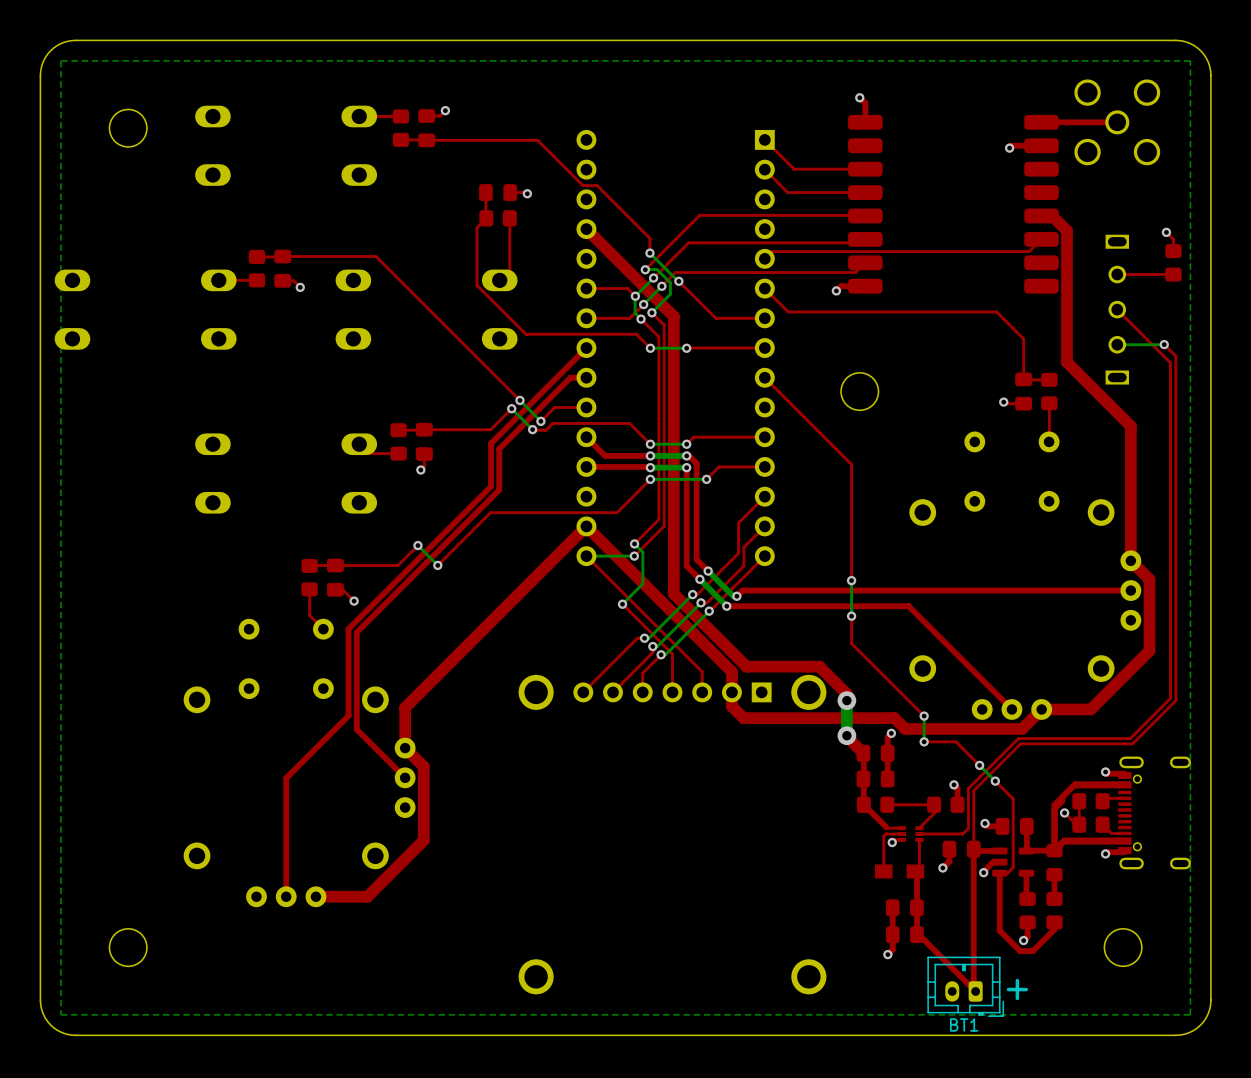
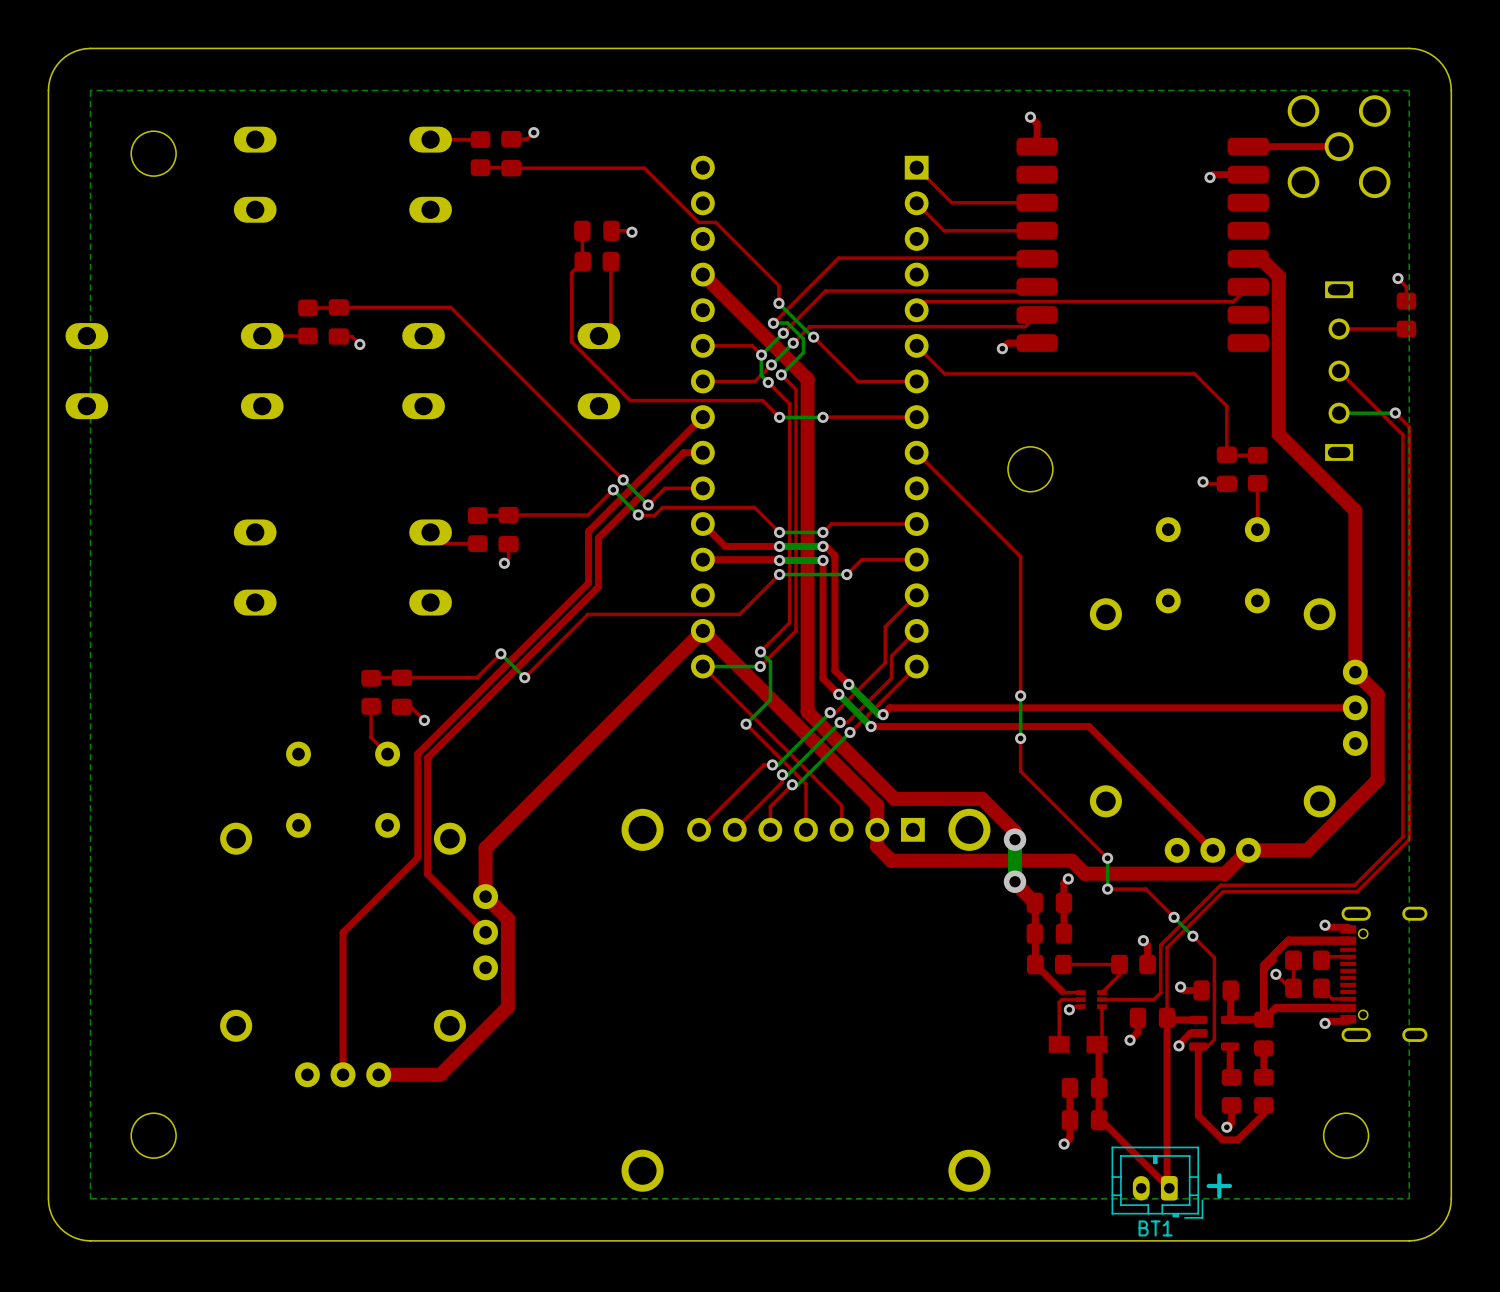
bottom zone outline: (1190, 60) (60, 60) (60, 1014) (1190, 1014) (1190, 60) -> (1409, 90) (1409, 1198) (90, 1198) (90, 90) (1409, 90)

